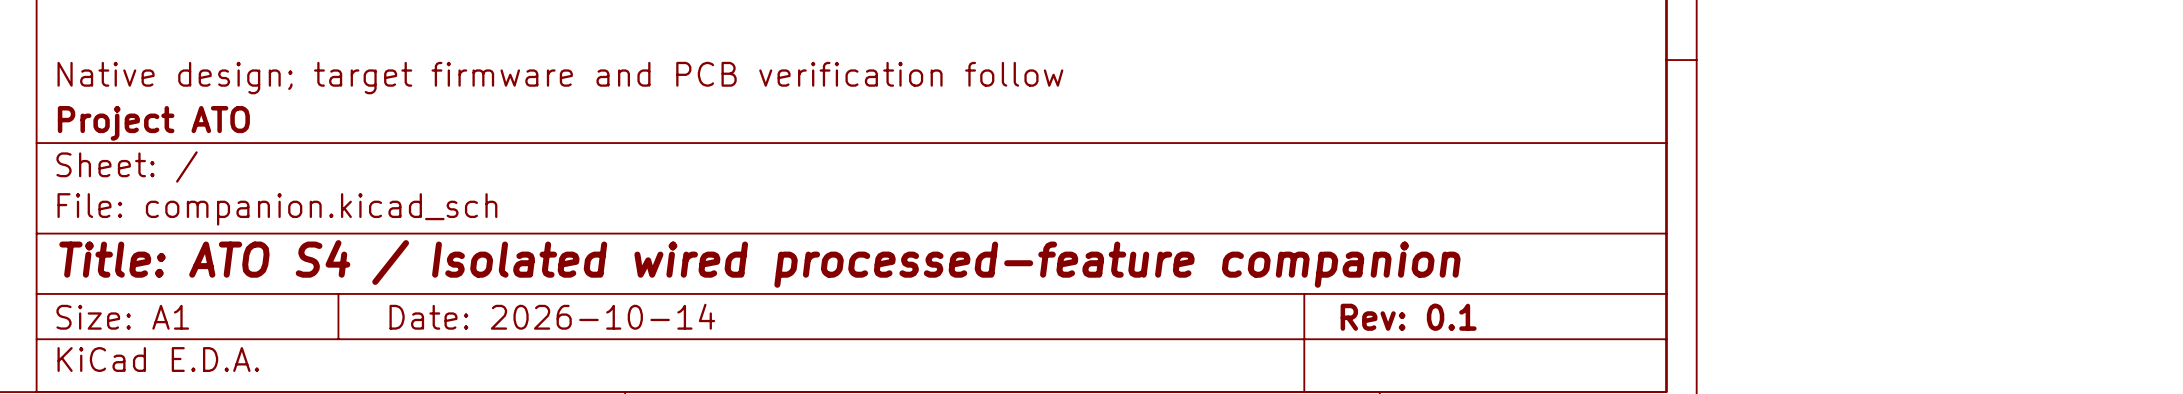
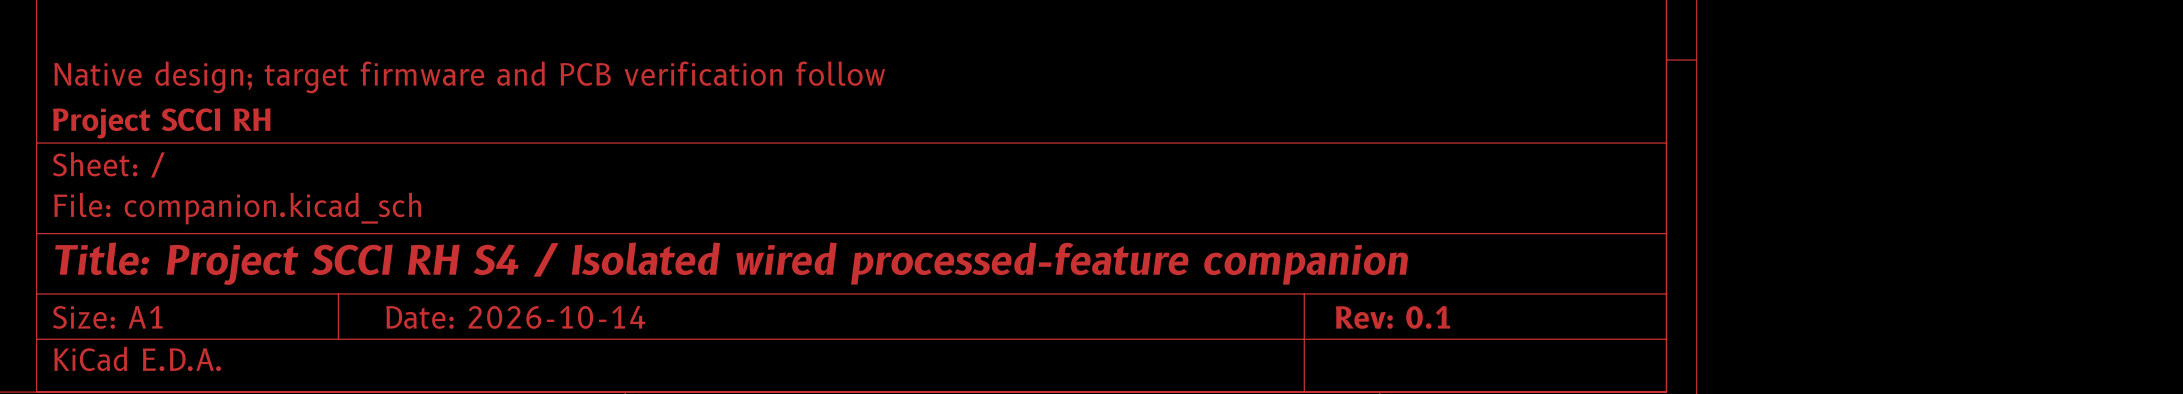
title block: Project ATO (153, 123) -> Project SCCI RH (161, 123)
title block: Title: ATO S4 / Isolated wired processed-feature companion (759, 263) -> Title: Project SCCI RH S4 / Isolated wired processed-feature companion (731, 263)

